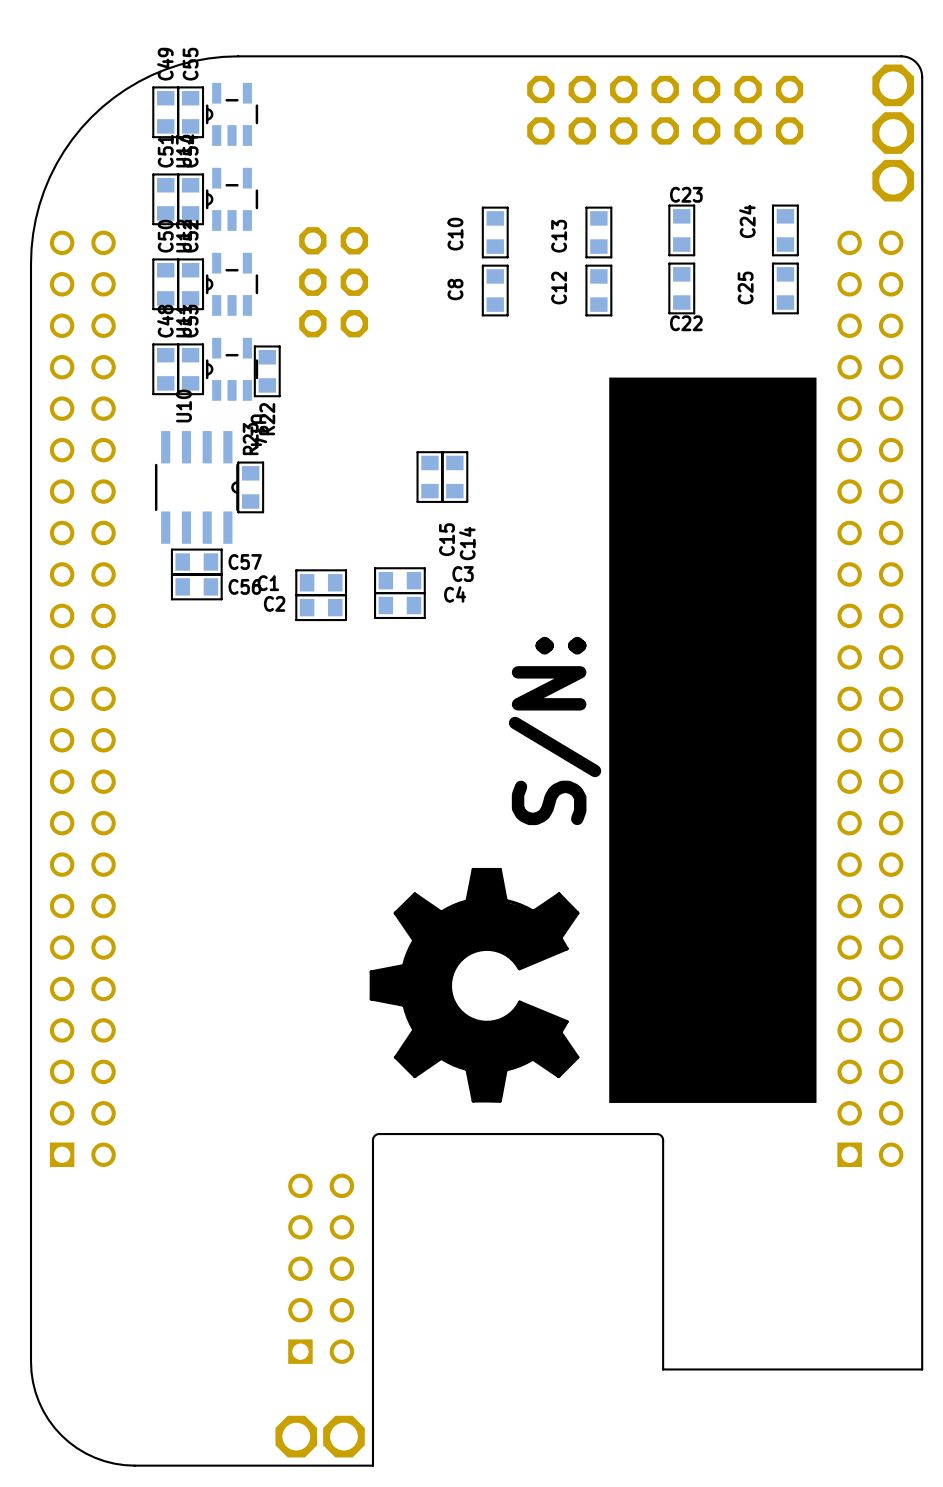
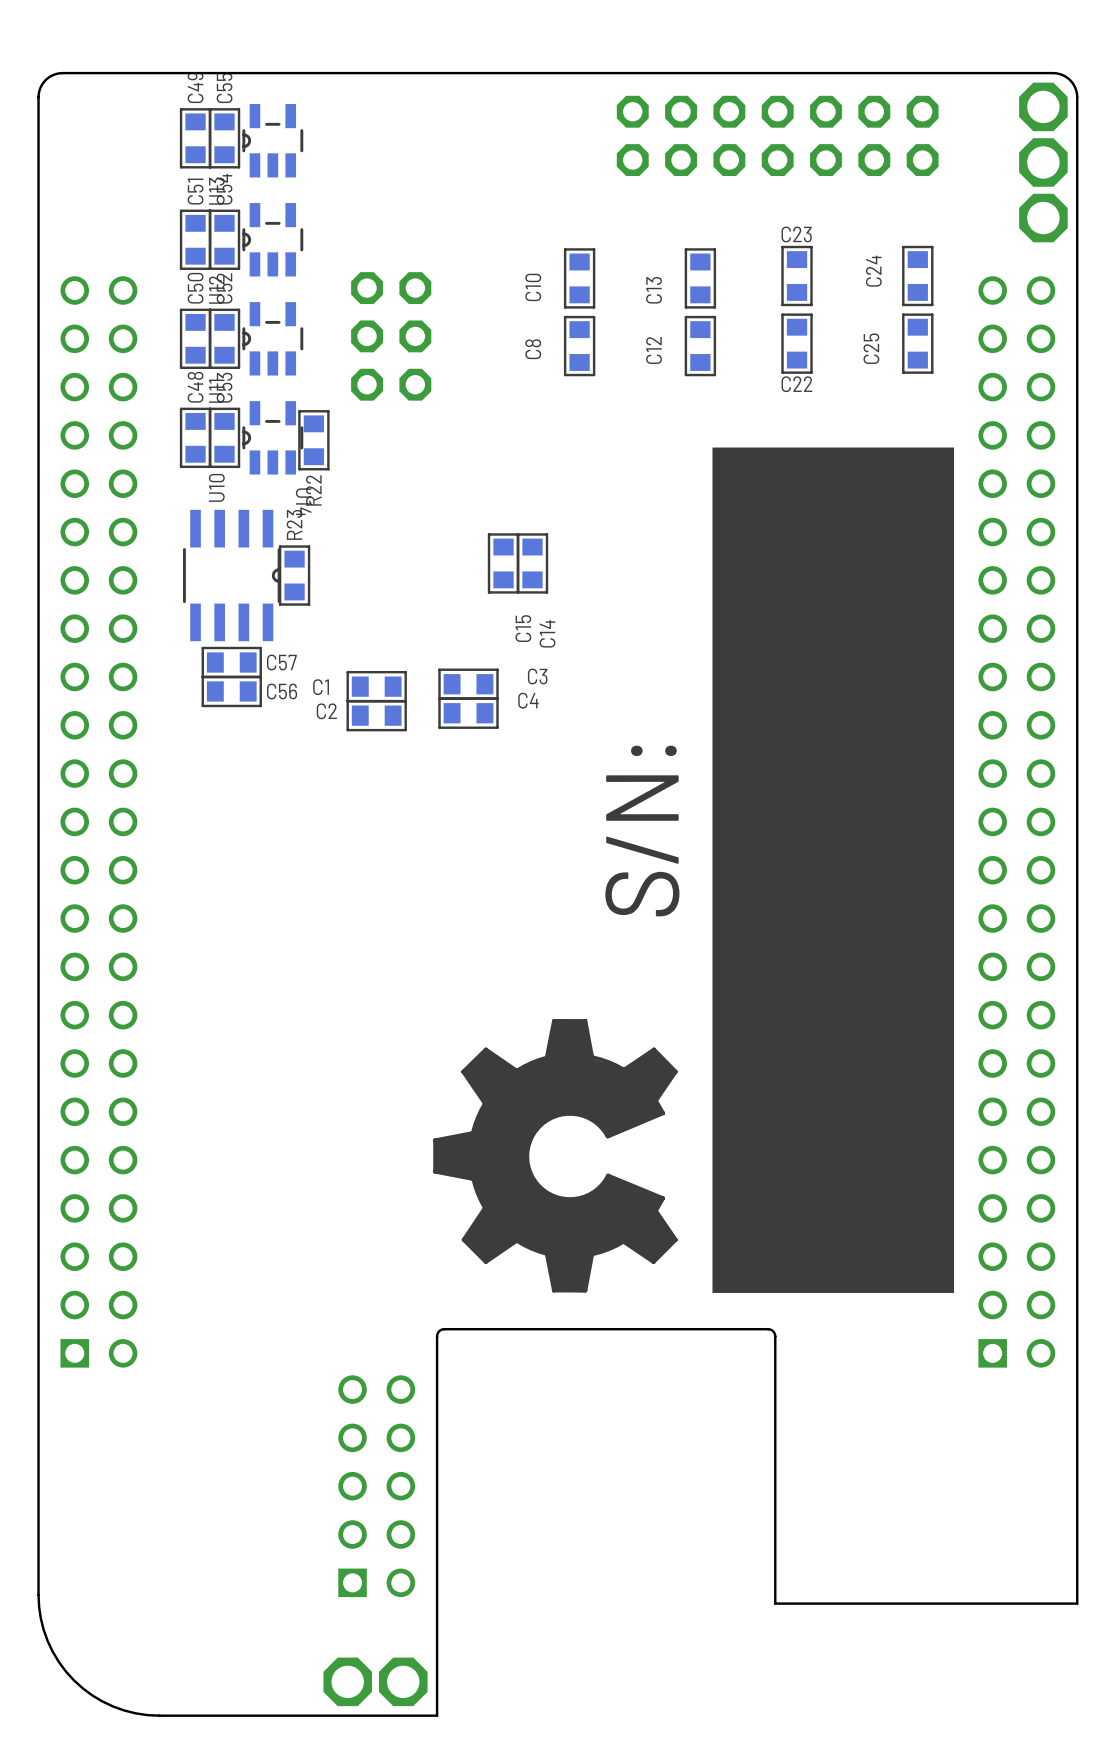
part footprint: [29, 55, 924, 1467] -> [37, 71, 1079, 1717]

